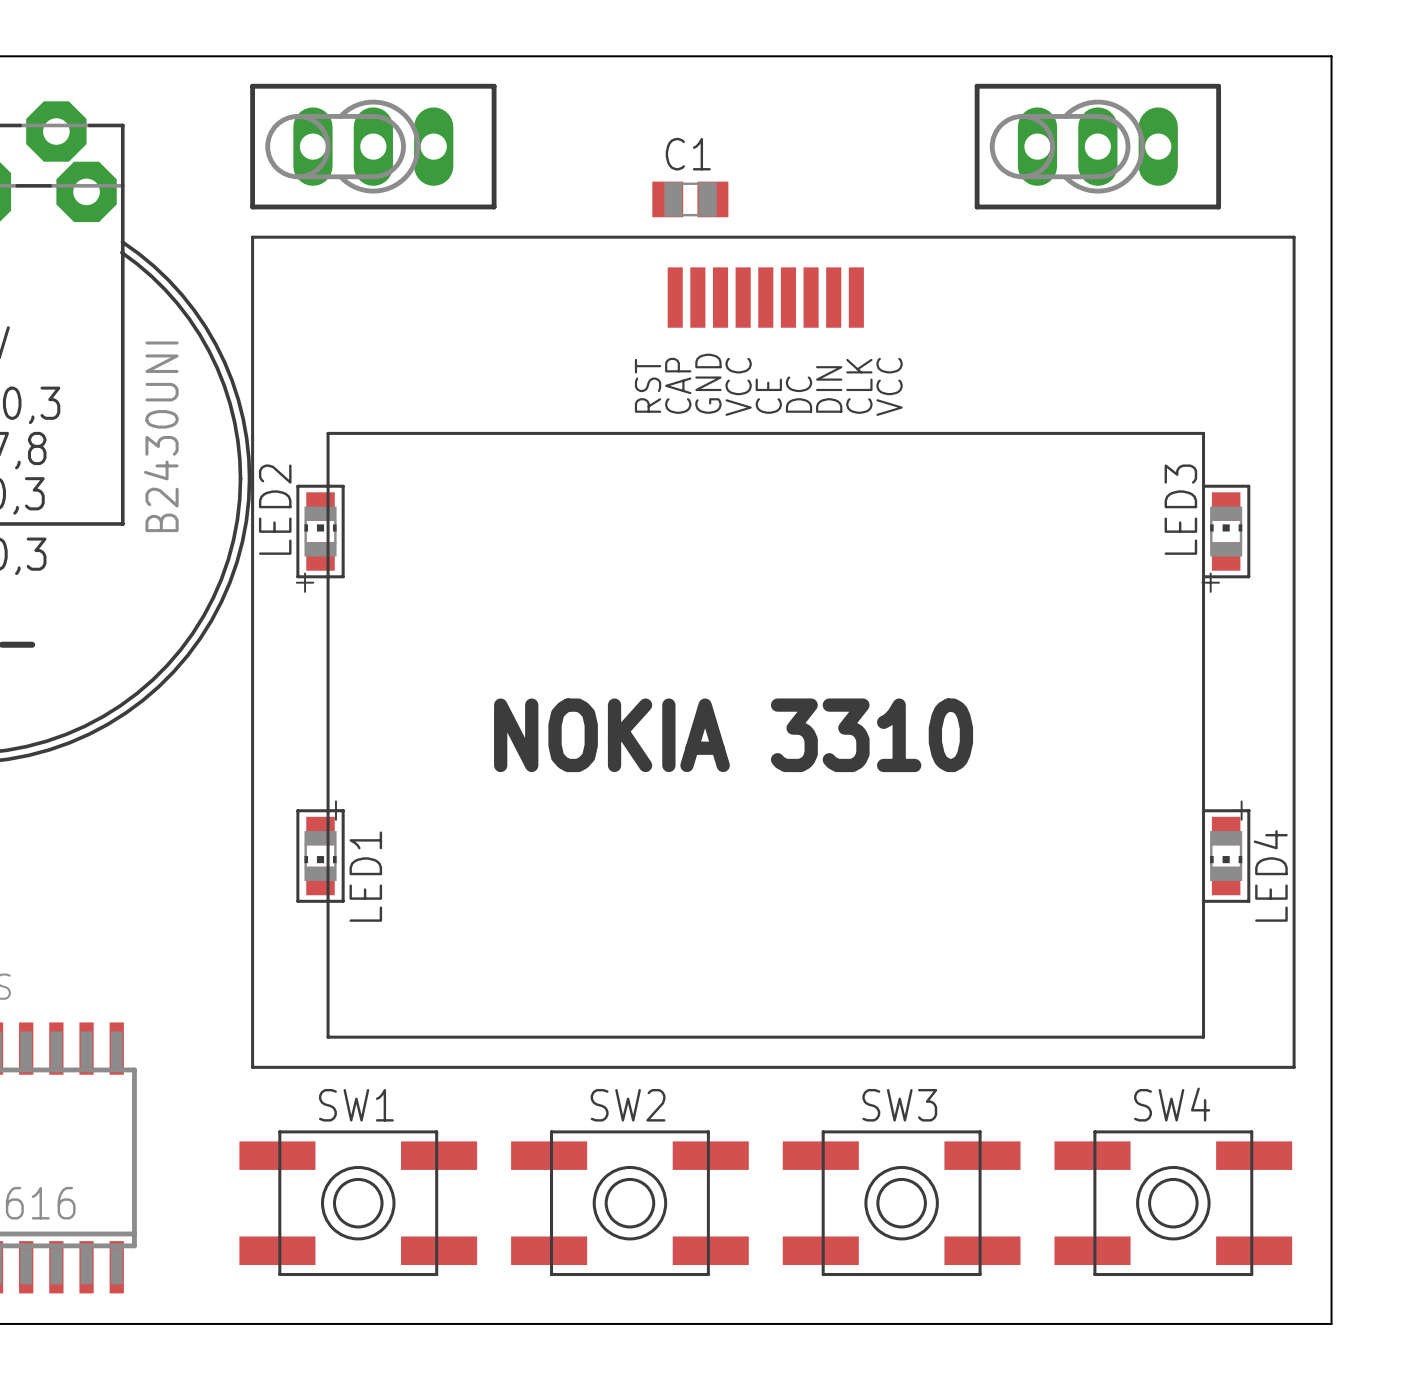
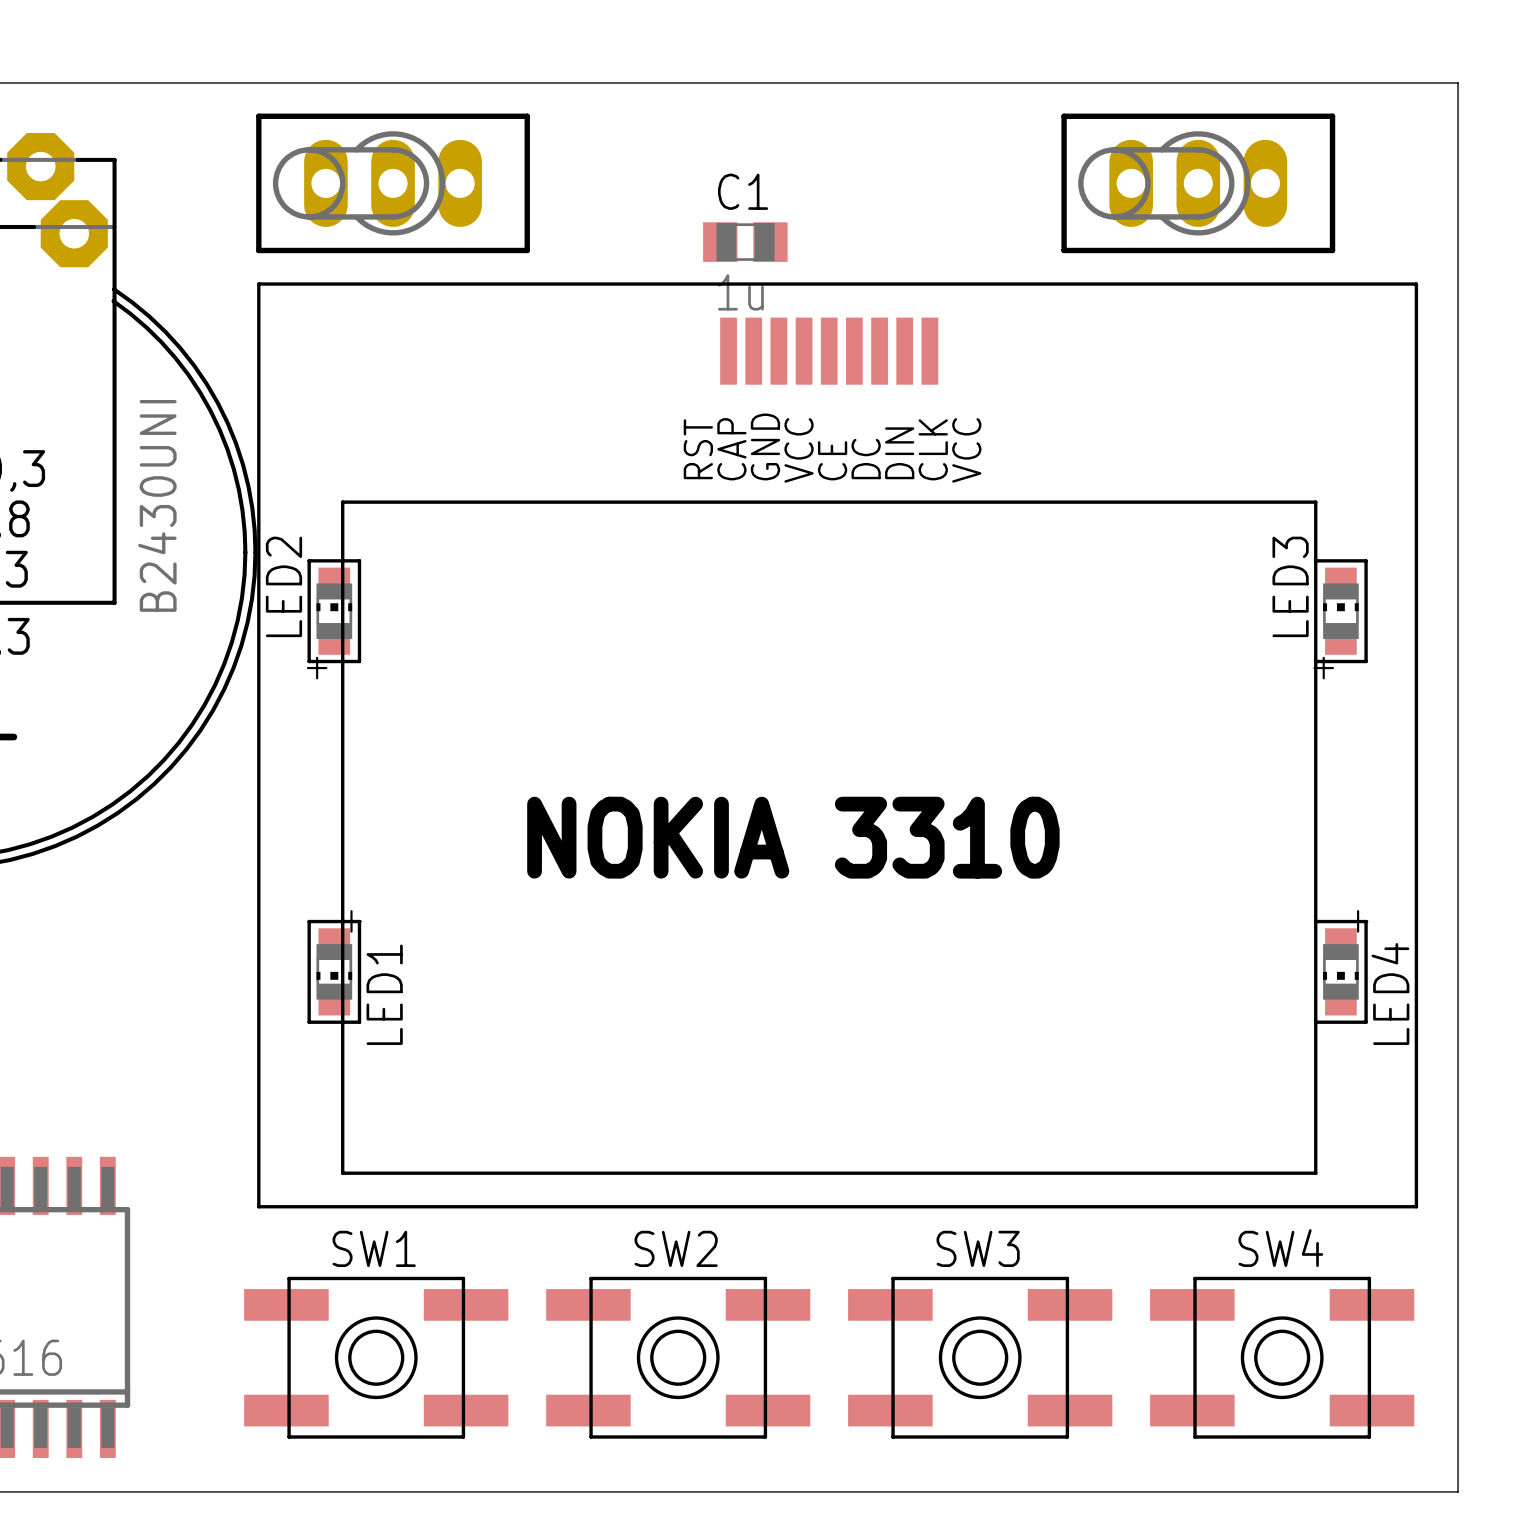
C1 value: none -> 1u (740, 292)

